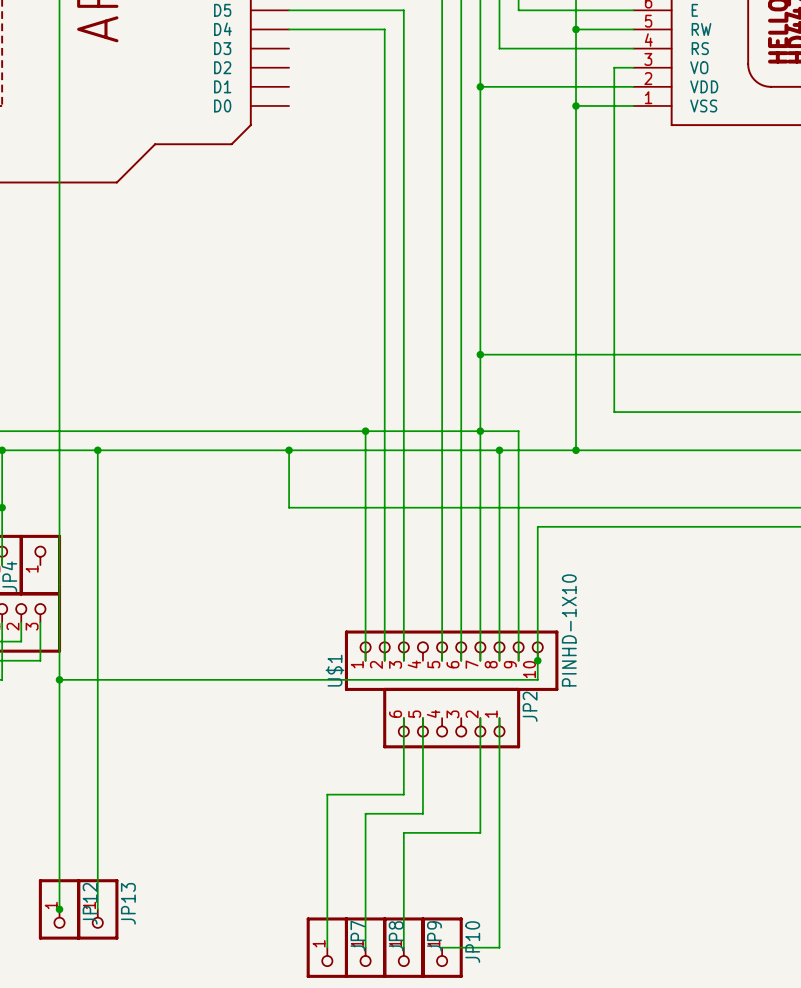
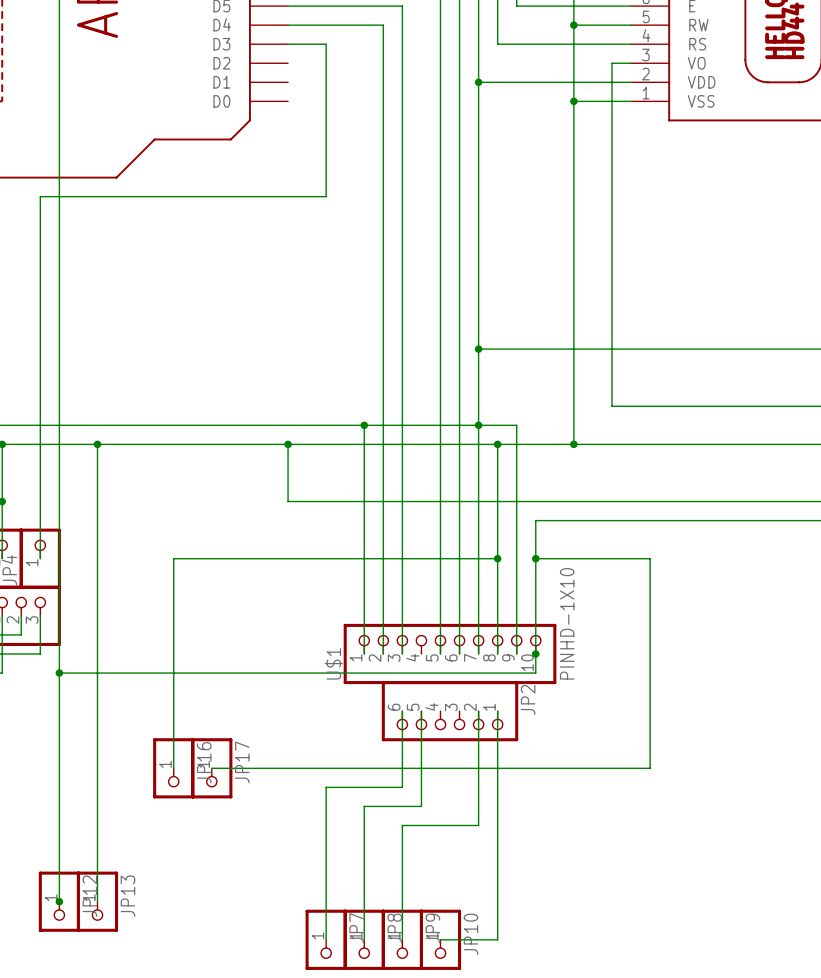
wire: none -> (288, 44) (326, 44) (326, 196) (40, 196) (40, 558)
wire: none -> (497, 558) (173, 558) (173, 768)
junction: none -> (497, 558)
wire: none -> (535, 558) (650, 558) (650, 768) (211, 768)
junction: none -> (535, 558)
JP16: none -> (173, 768)
JP17: none -> (211, 768)

